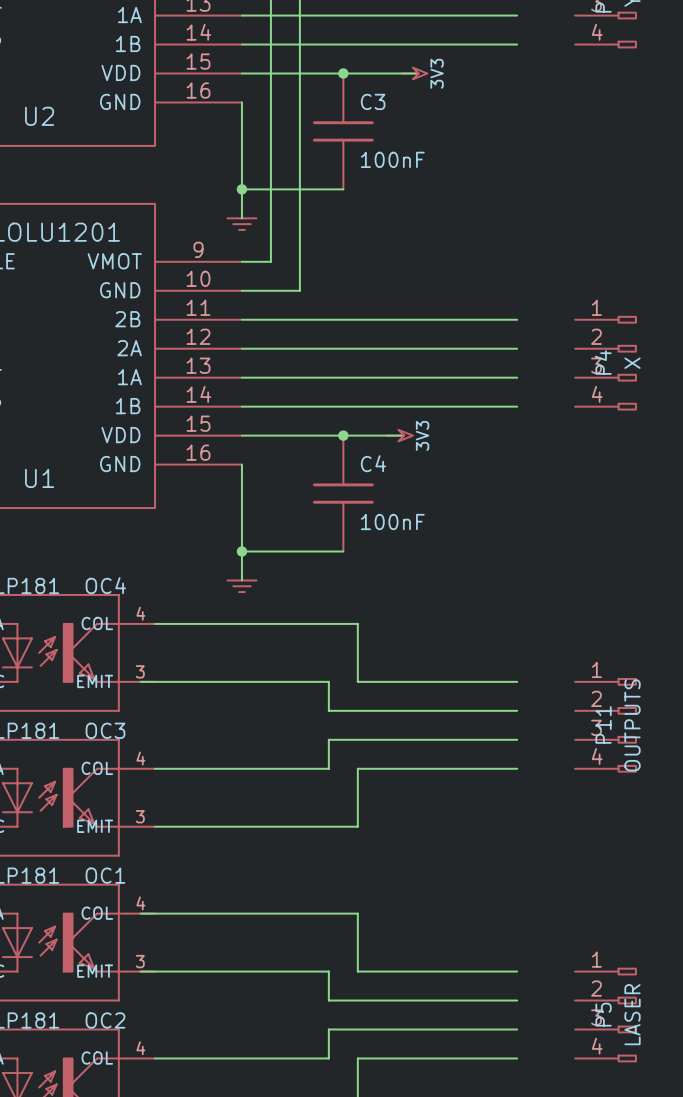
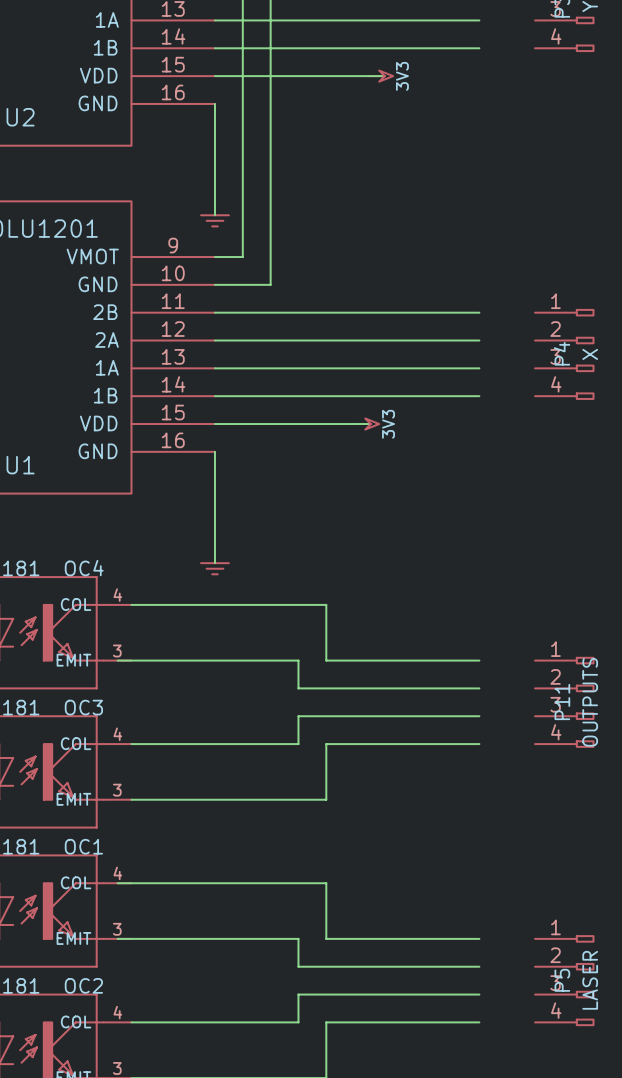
junction: (343, 73) -> none
C3: 100nF (343, 131) -> none
wire: (241, 189) (343, 189) -> none
junction: (241, 189) -> none
junction: (343, 435) -> none
C4: 100nF (343, 493) -> none
wire: (241, 551) (343, 551) -> none
junction: (241, 551) -> none

